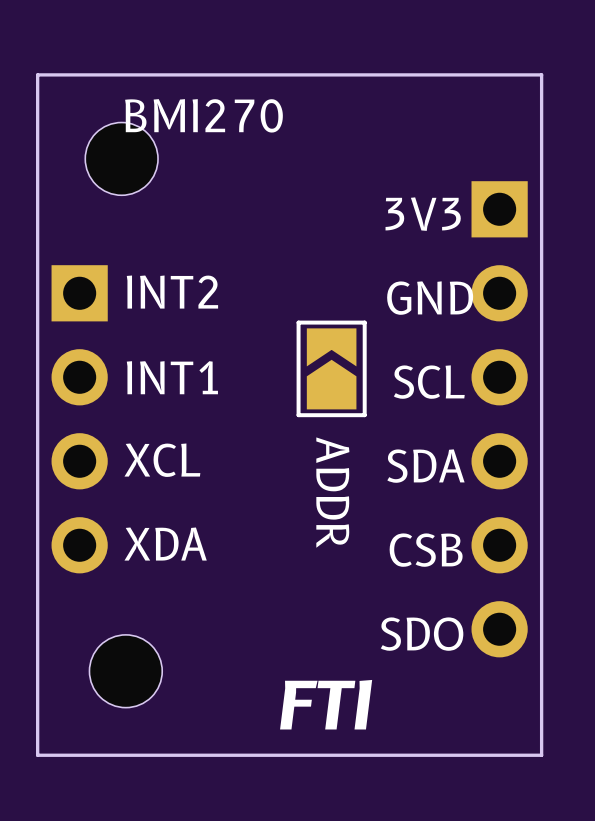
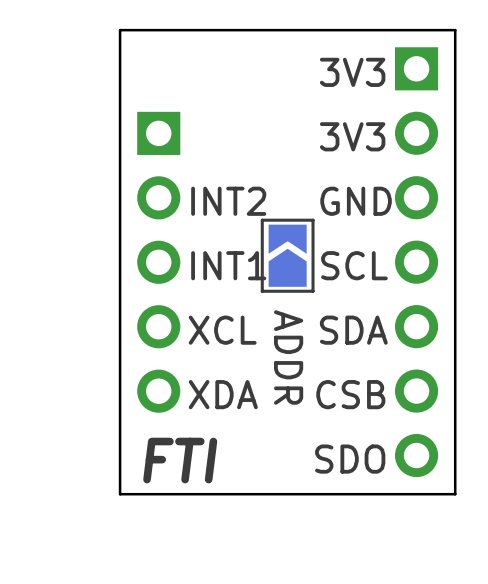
board edge: (541, 74) (541, 755) (37, 755) (37, 74) (113, 74) -> (448, 30) (455, 30) (455, 494) (120, 494) (120, 30)
text: BMI270 (203, 115) -> none
text: none -> 3V3 (352, 72)
part: (121, 158) -> none
text position: INT2 (172, 292) -> INT2 (228, 201)
part: none -> (158, 262)
text position: INT1 (172, 377) -> INT1 (228, 265)
part: none -> (416, 262)
part: (79, 419) -> none
part: (499, 419) -> none
text position: XCL (162, 460) -> XCL (222, 330)
text position: XDA (165, 544) -> XDA (223, 394)
part: (125, 671) -> none
text position: FTI (326, 704) -> FTI (180, 460)

